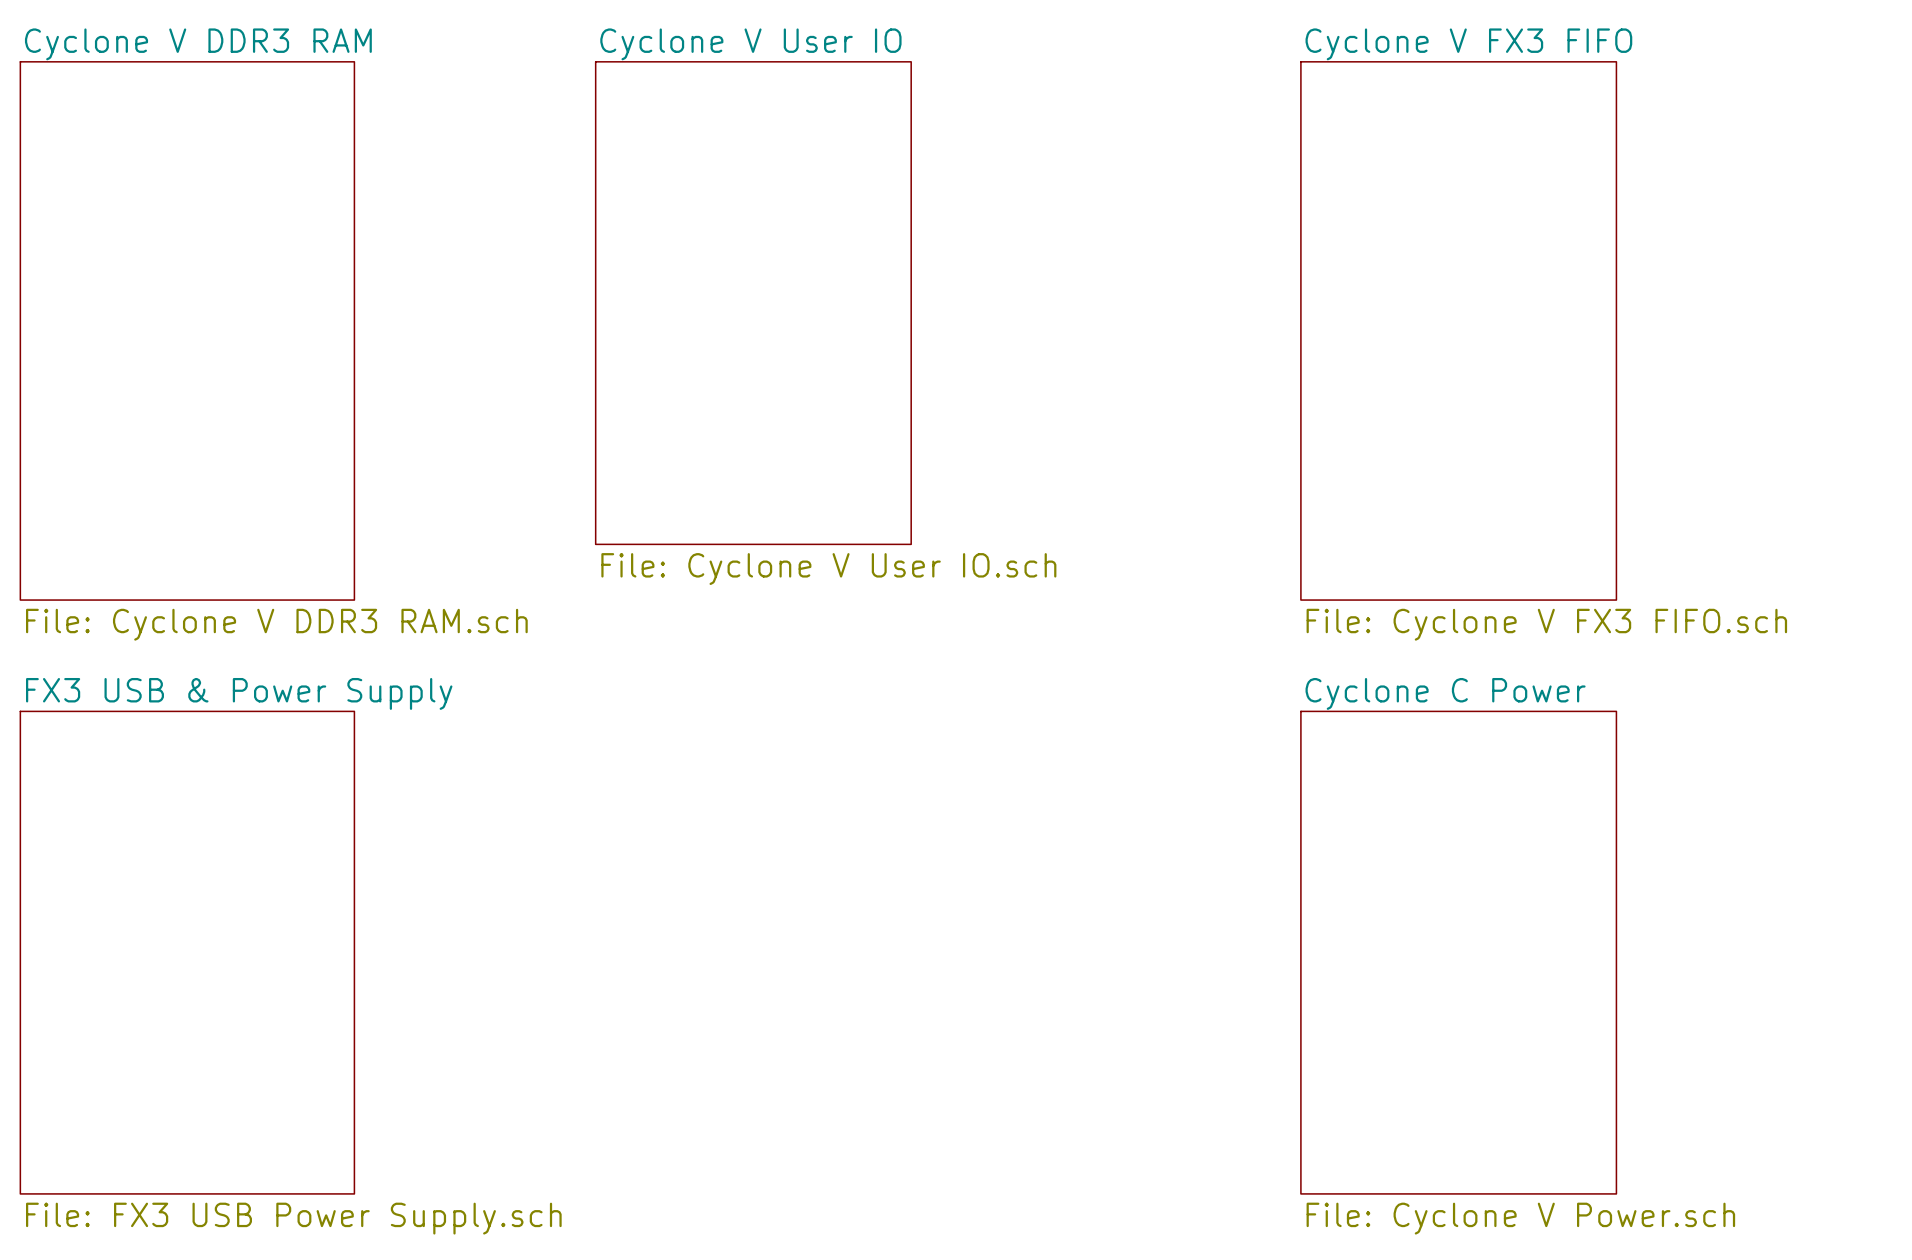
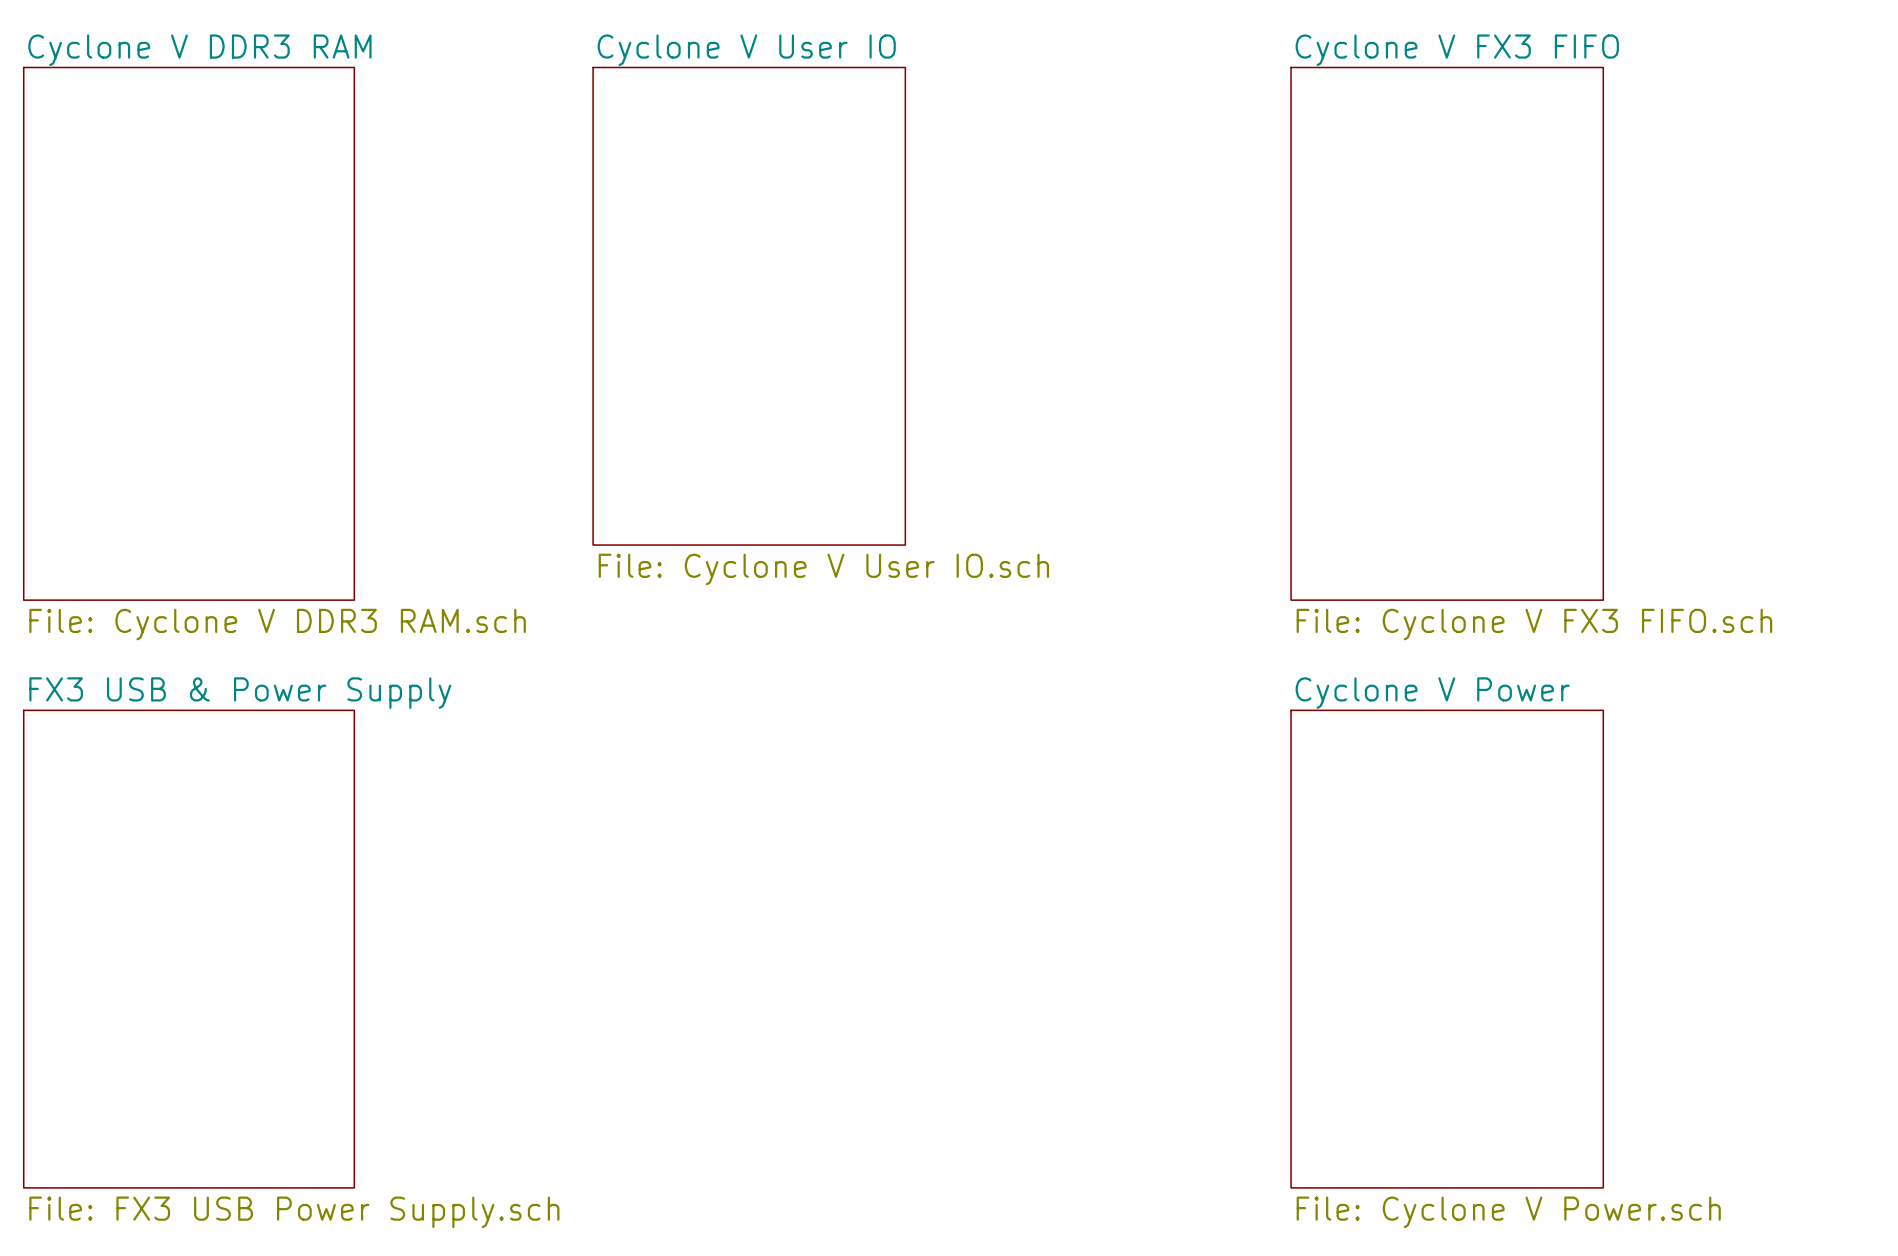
sheet Cyclone C Power name: Cyclone C Power (1445, 693) -> Cyclone V Power (1432, 693)

